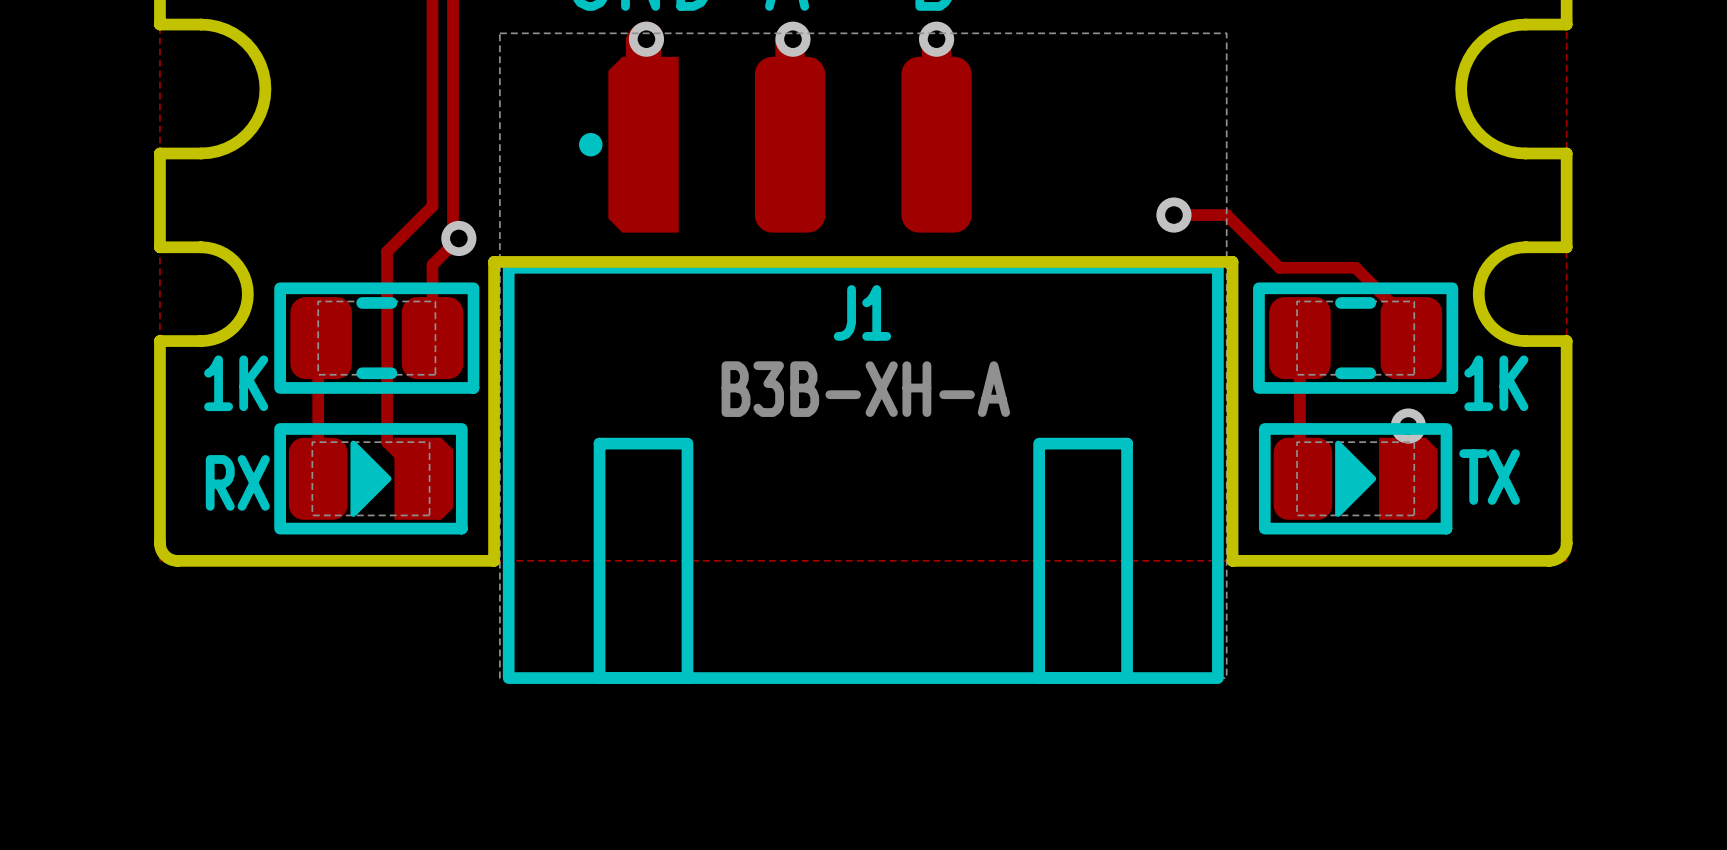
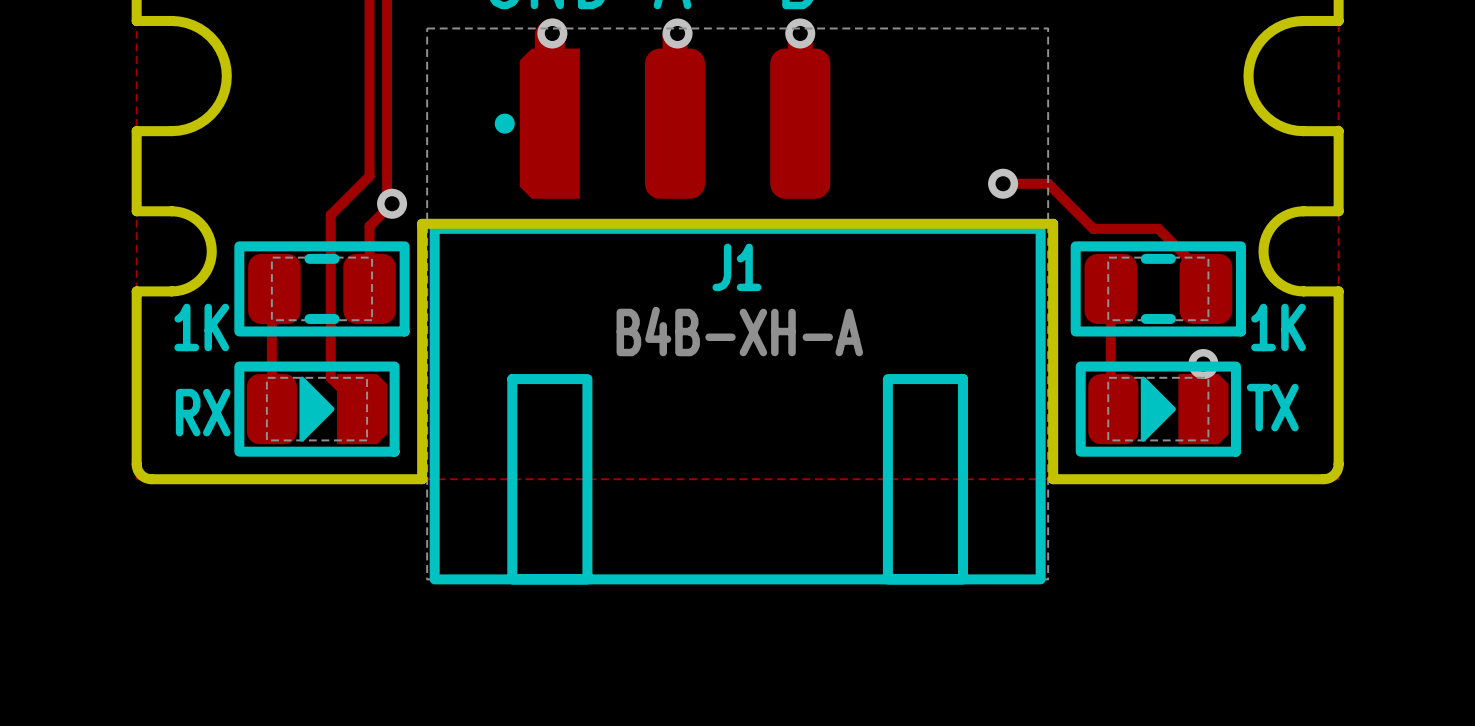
J1 value: B3B-XH-A (865, 389) -> B4B-XH-A (739, 331)

